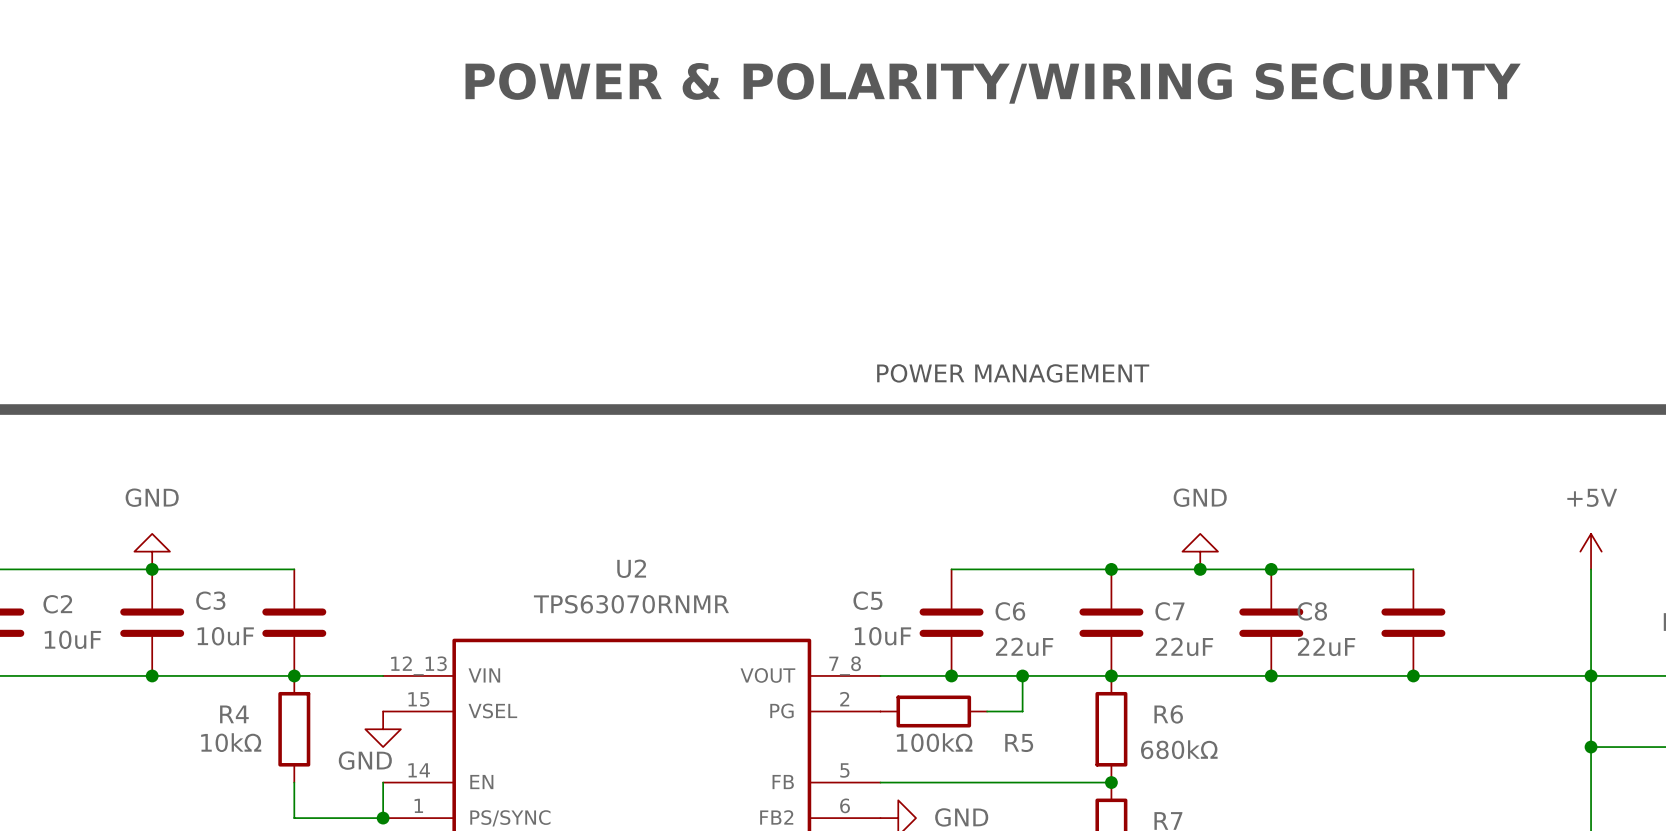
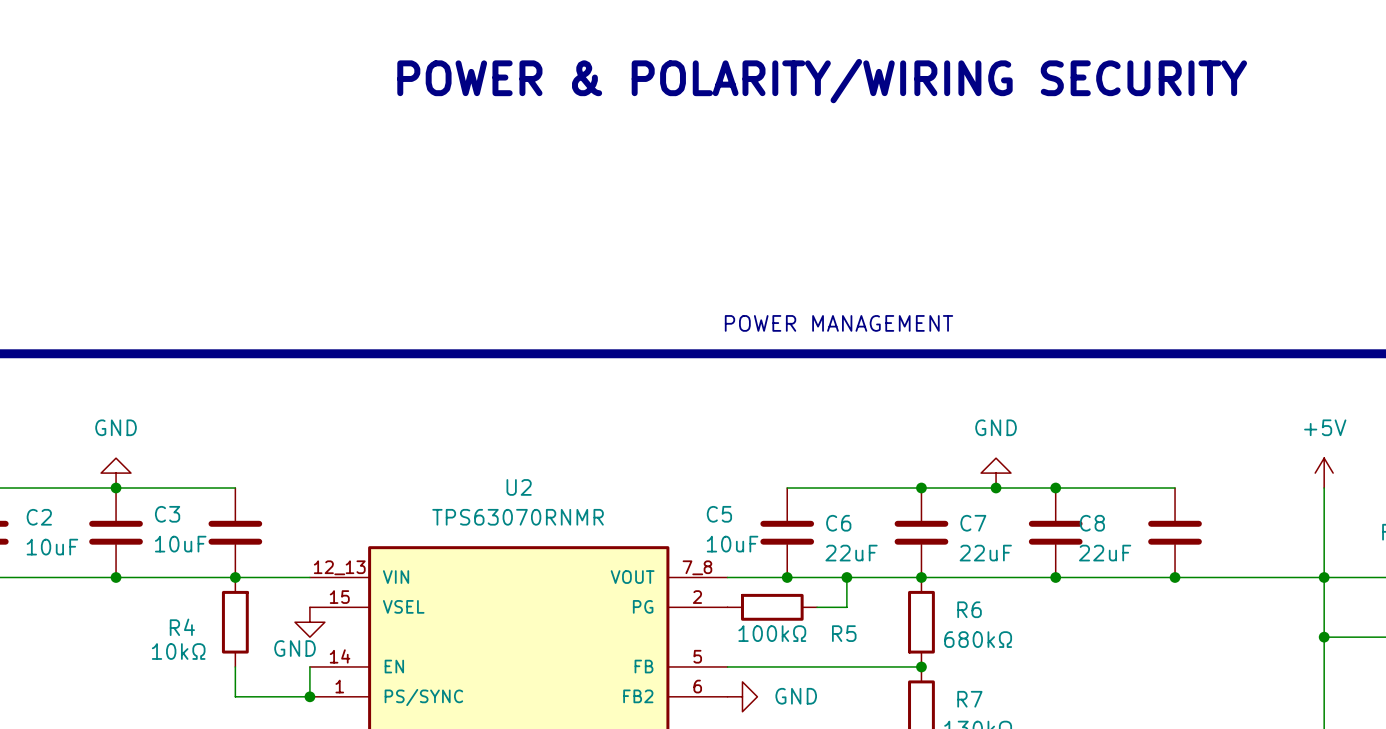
R4 name position: R4 (234, 714) -> R4 (182, 627)
R4 value position: 10kΩ (231, 742) -> 10kΩ (178, 651)

